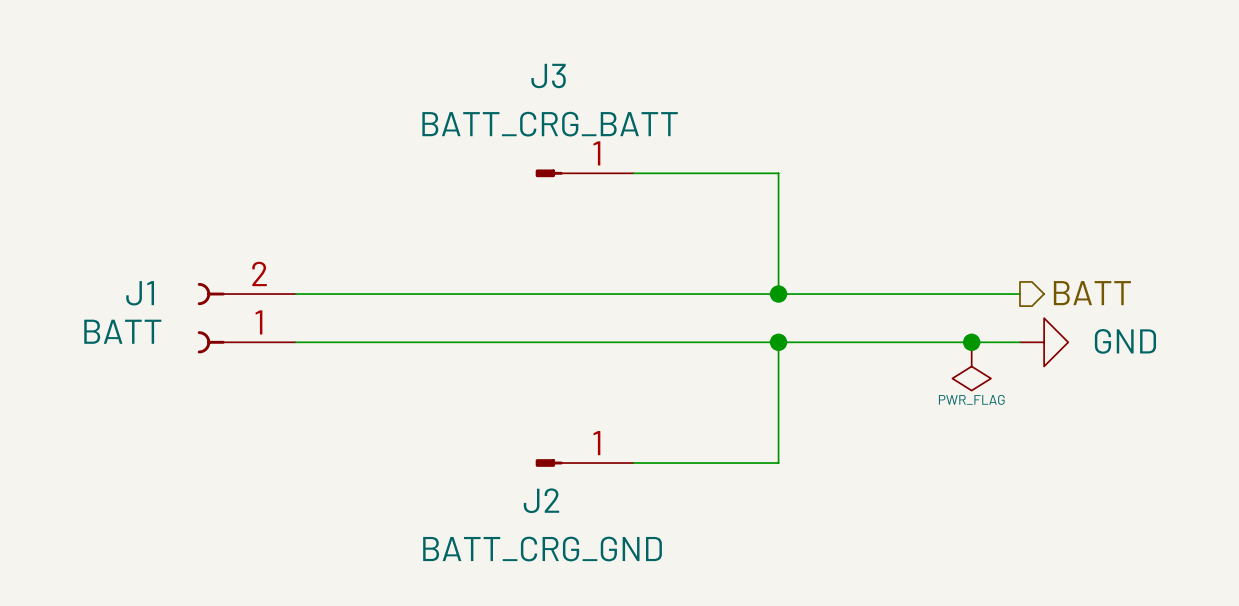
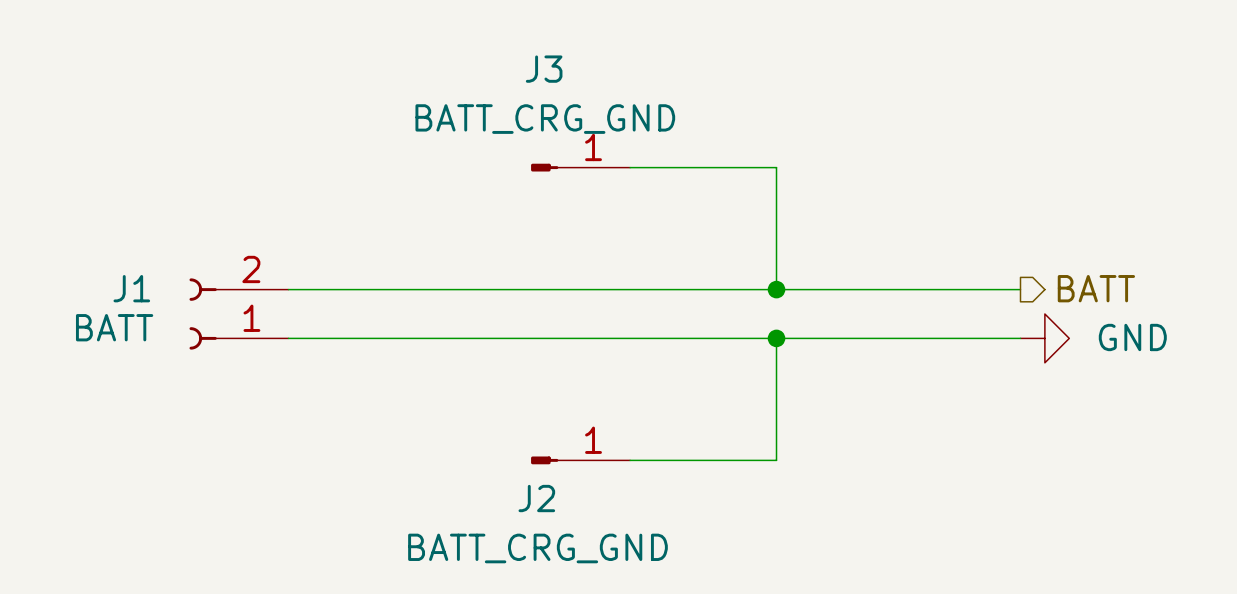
J3 value: BATT_CRG_BATT (550, 124) -> BATT_CRG_GND (545, 119)
junction: (971, 342) -> none
power symbol: PWR_FLAG (971, 366) -> none

